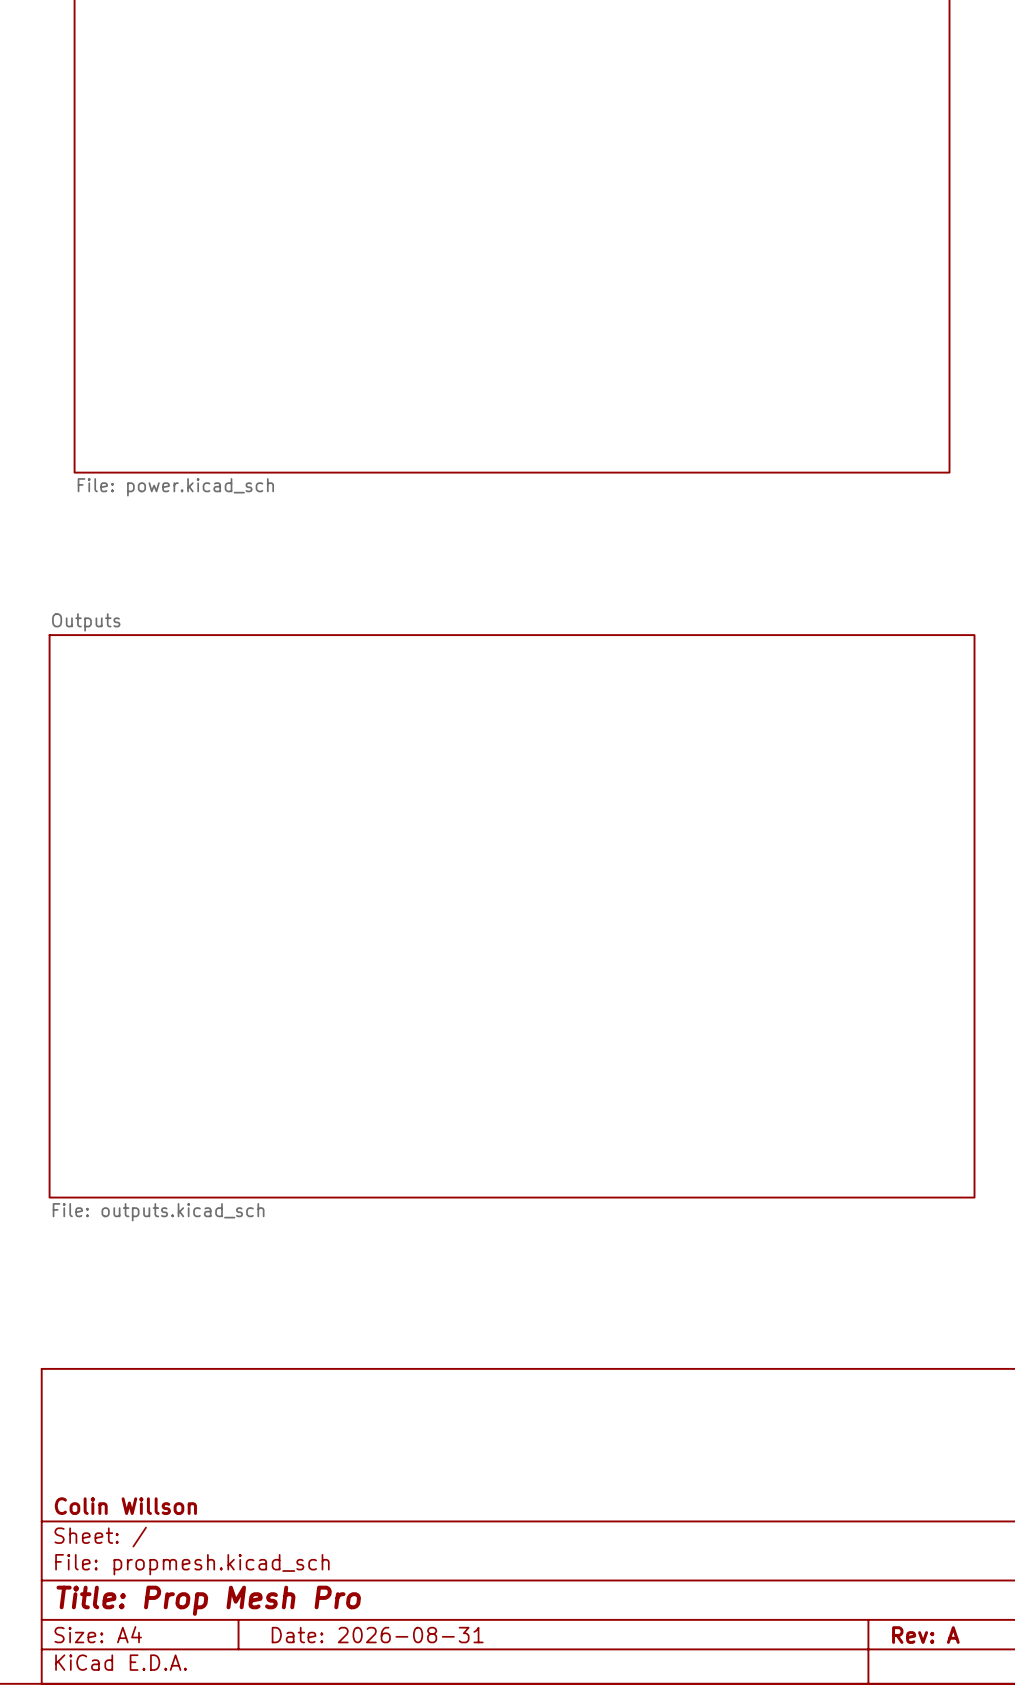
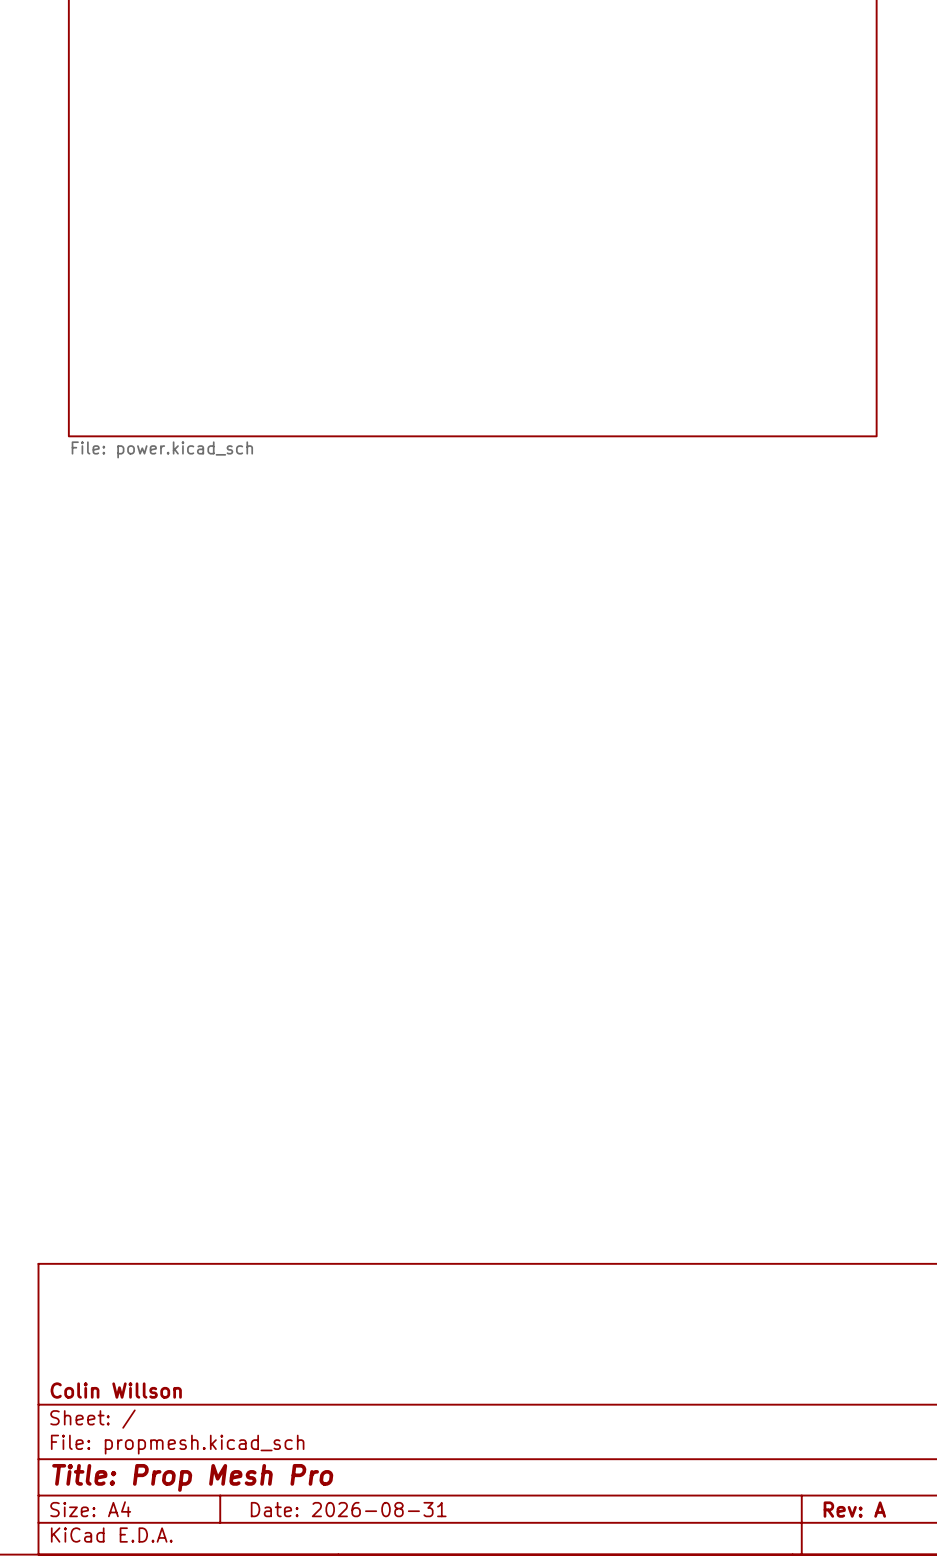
sheet Outputs: File: outputs.kicad_sch (512, 916) -> none

